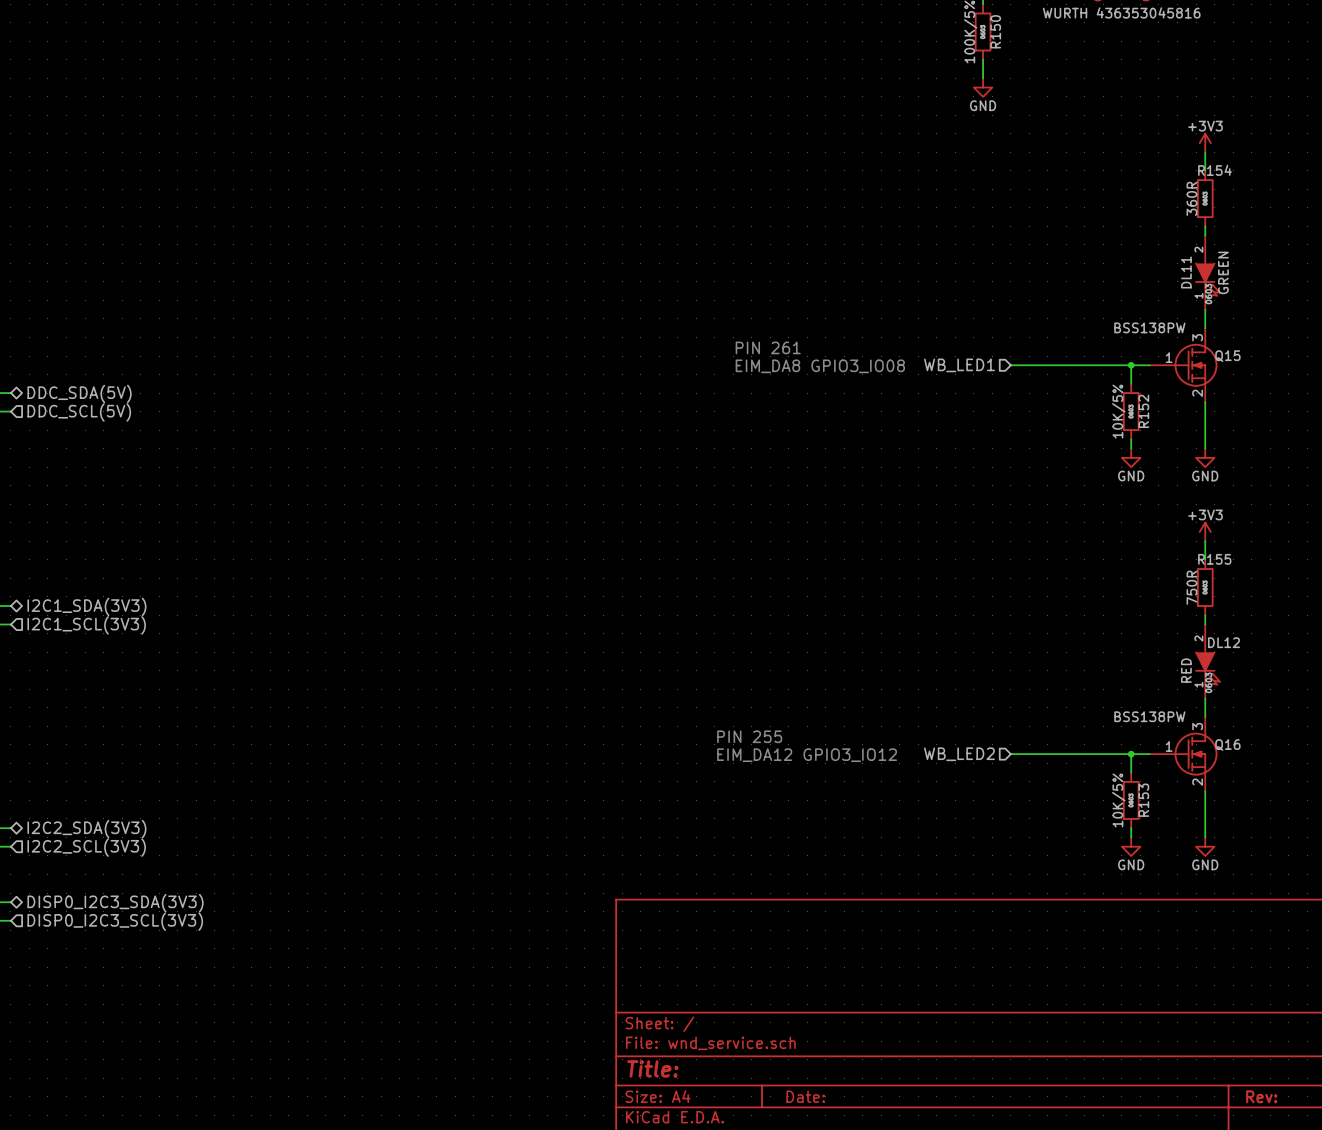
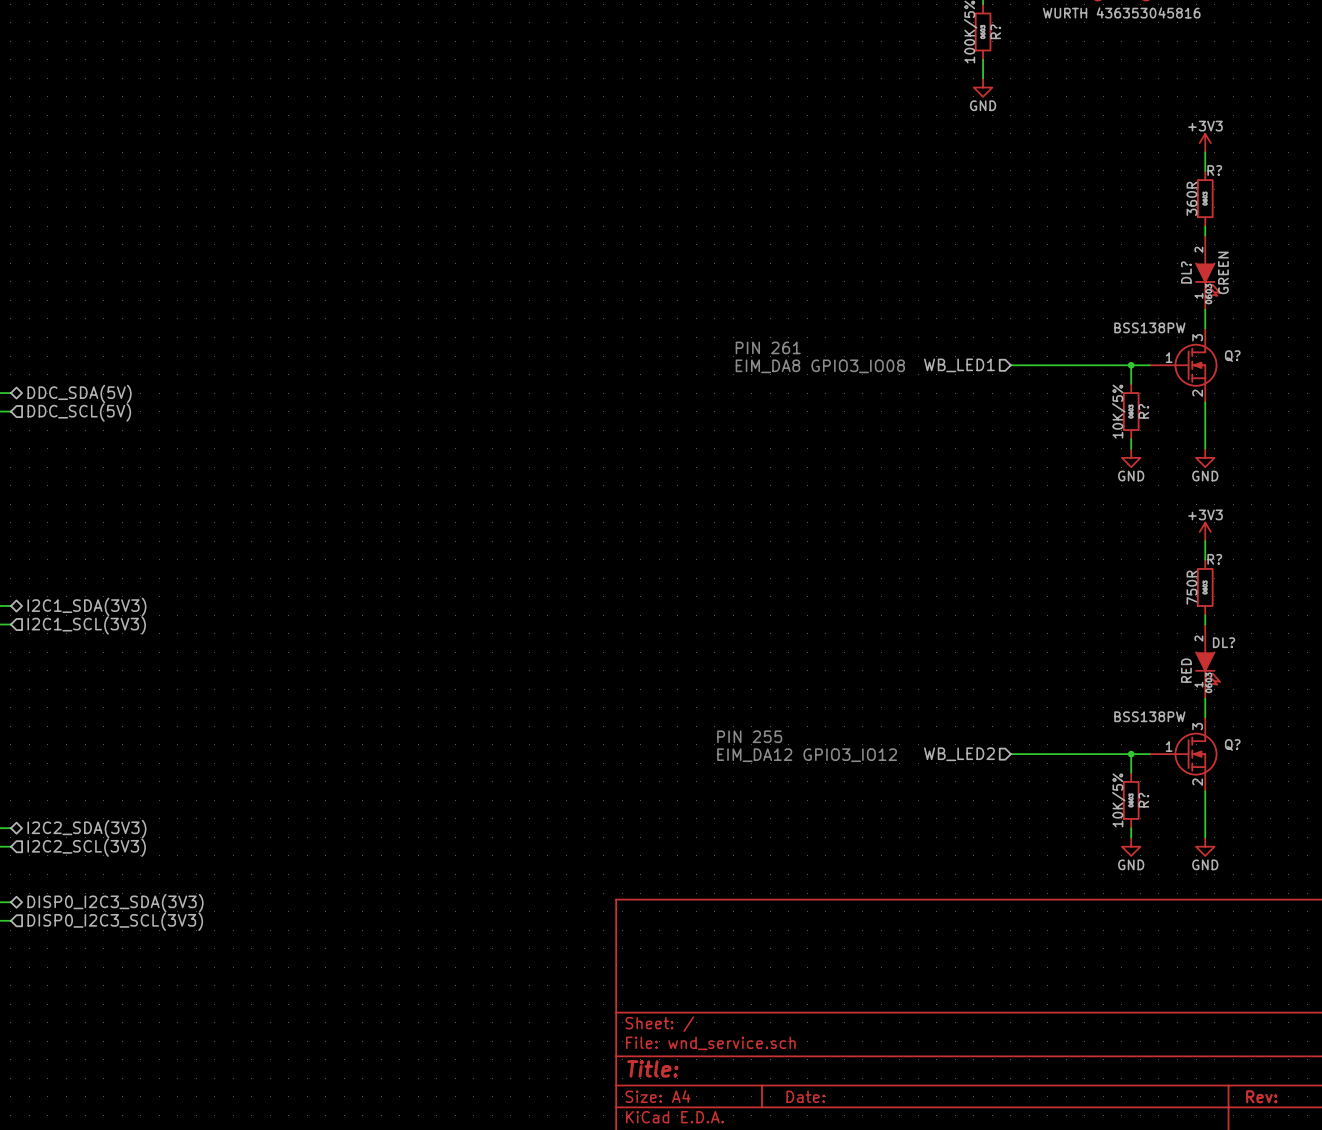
R150 name: R150 (995, 31) -> R? (995, 31)
R154 name: R154 (1214, 170) -> R? (1214, 170)
DL11 name: DL11 (1186, 272) -> DL? (1186, 272)
Q15 name: Q15 (1227, 356) -> Q? (1232, 356)
R152 name: R152 (1143, 411) -> R? (1143, 411)
R155 name: R155 (1214, 559) -> R? (1214, 559)
DL12 name: DL12 (1224, 642) -> DL? (1224, 642)
Q16 name: Q16 (1227, 744) -> Q? (1232, 744)
R153 name: R153 (1143, 800) -> R? (1143, 800)

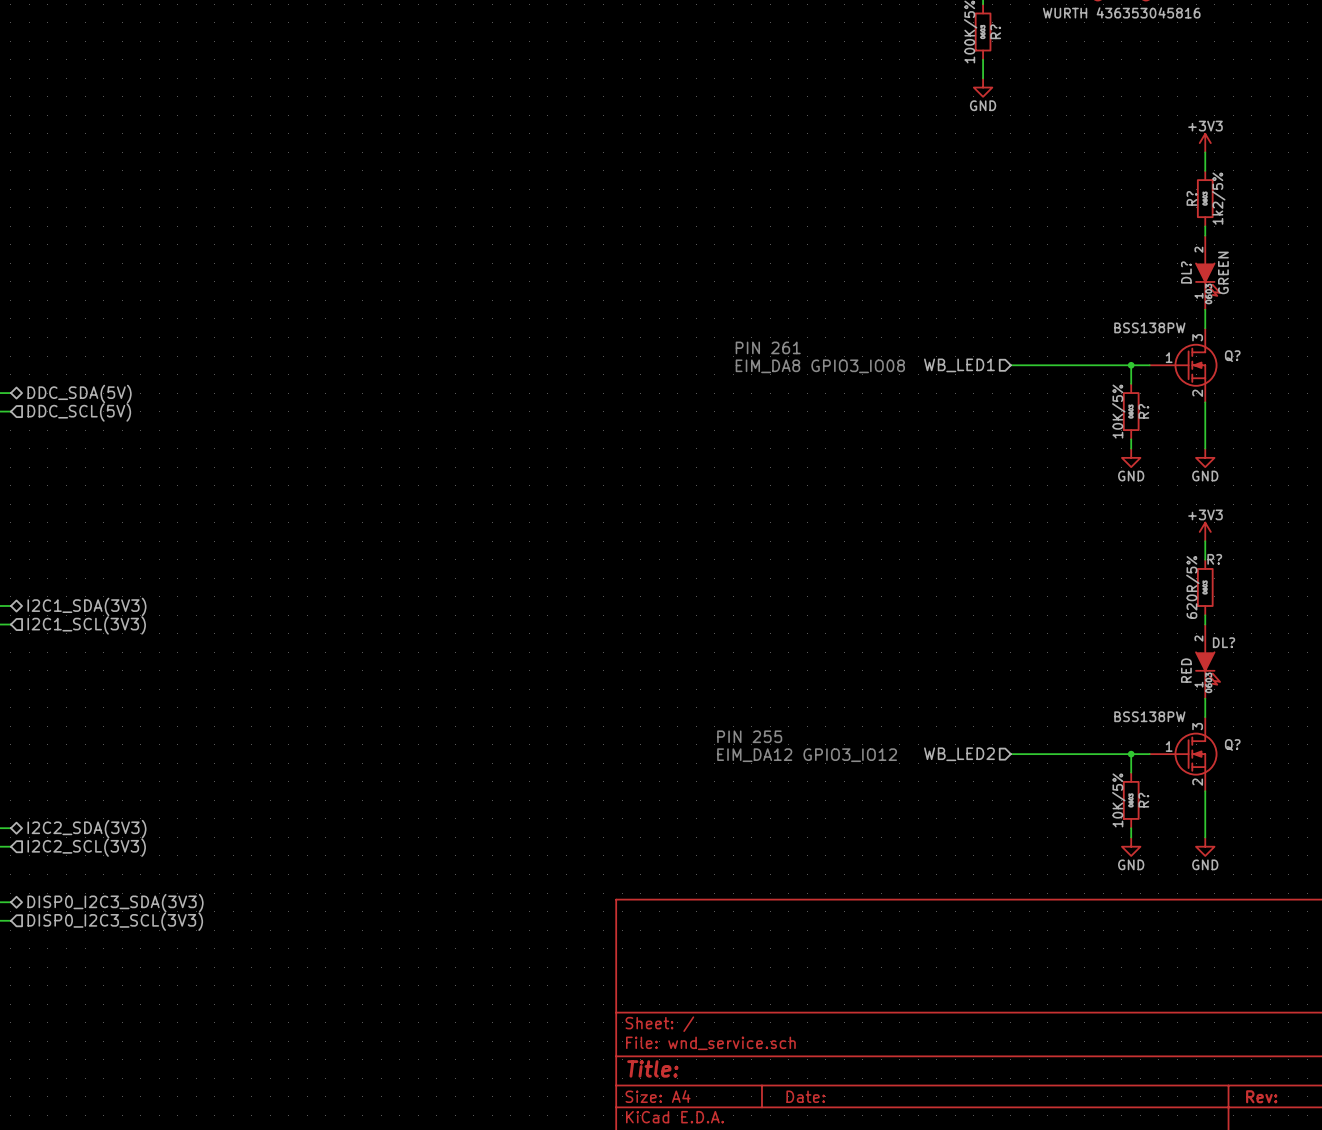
R? name rotation: 0° (1214, 170) -> 90° counterclockwise (1191, 198)
R? name position: R? (1214, 170) -> R? (1191, 198)
R? value: 360R (1191, 198) -> 1k2/5% (1218, 198)
R? value: 750R (1191, 587) -> 620R/5% (1192, 587)

